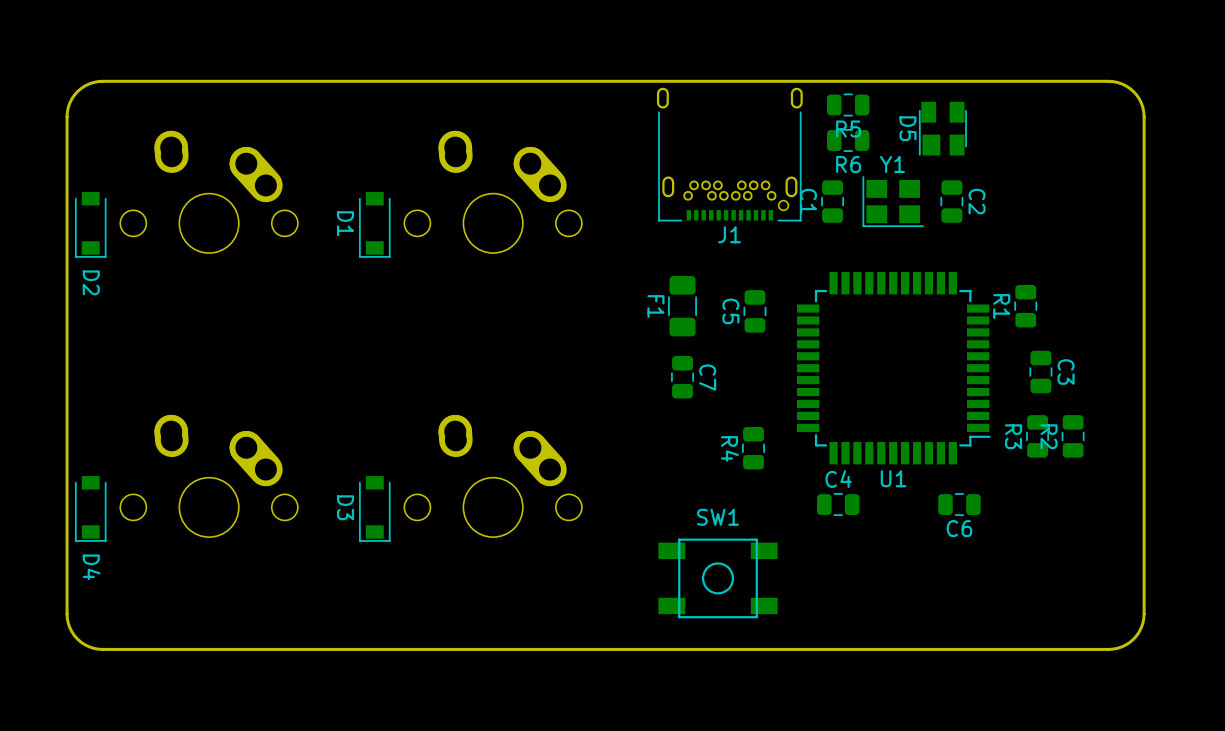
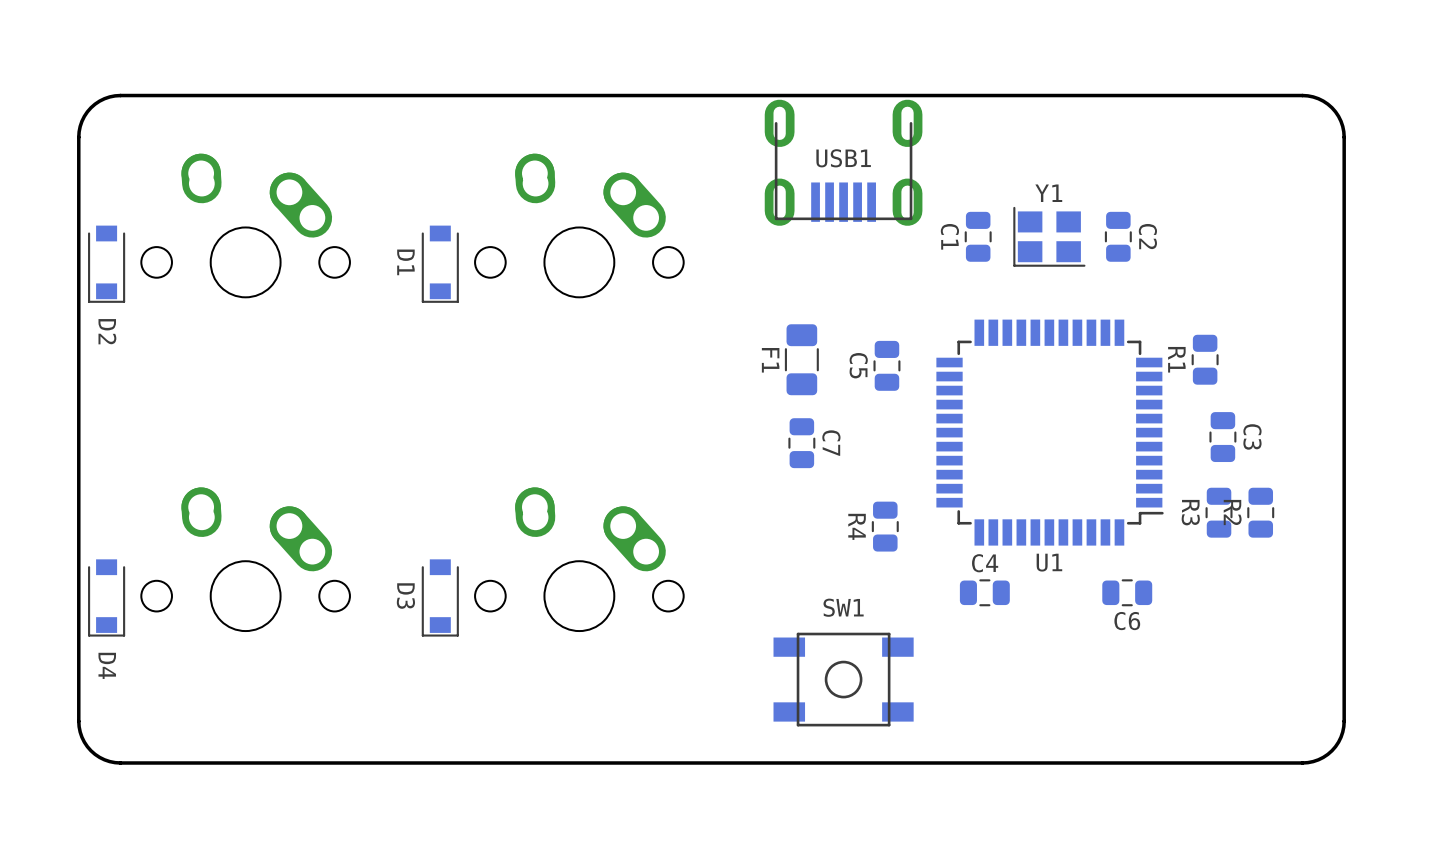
R5: (848, 104) -> none
D5: (942, 128) -> none
USB1: none -> (843, 162)
R6: (848, 140) -> none
J1: (729, 154) -> none

